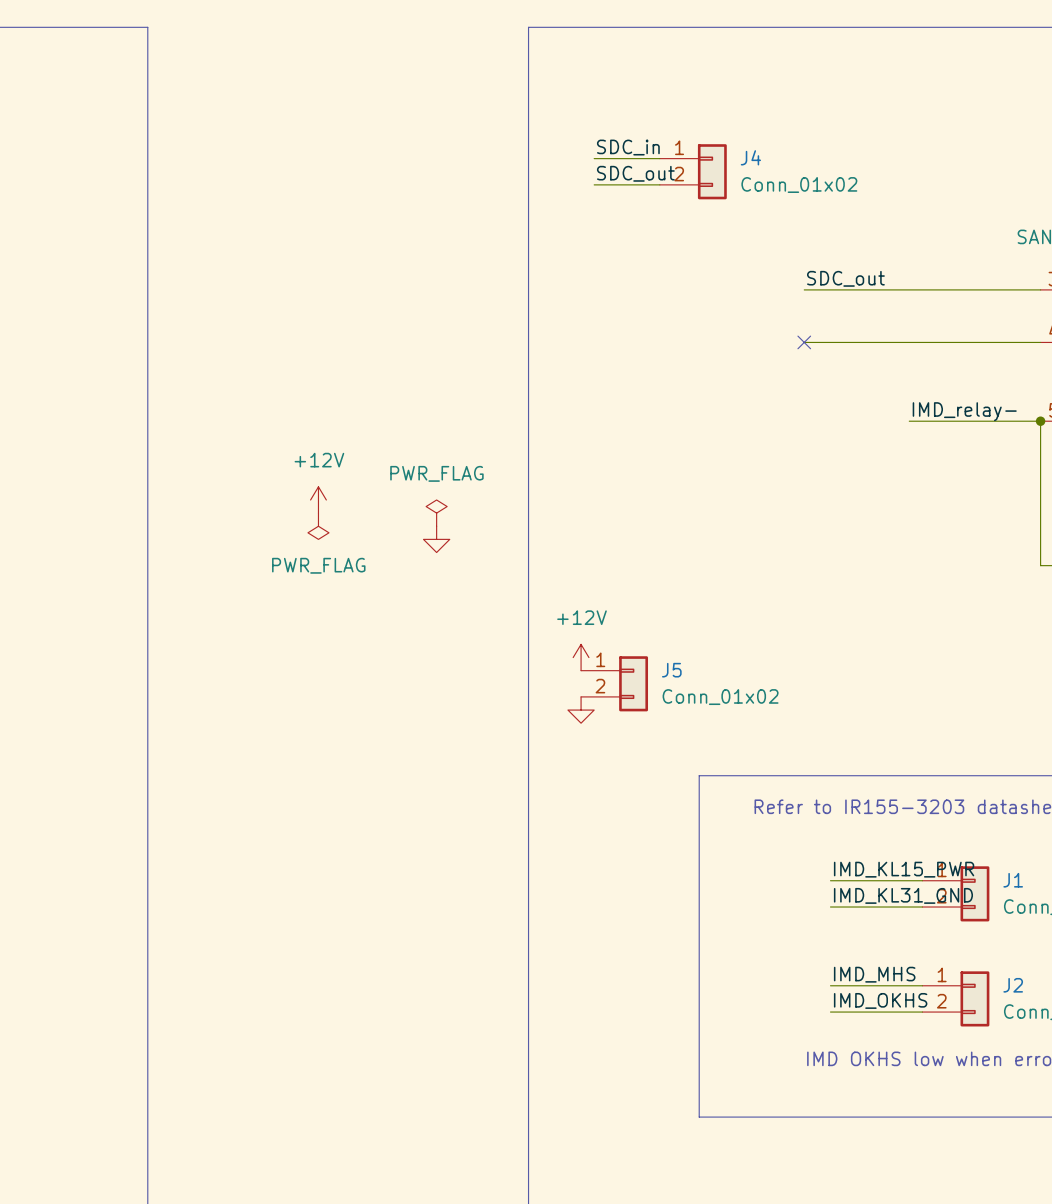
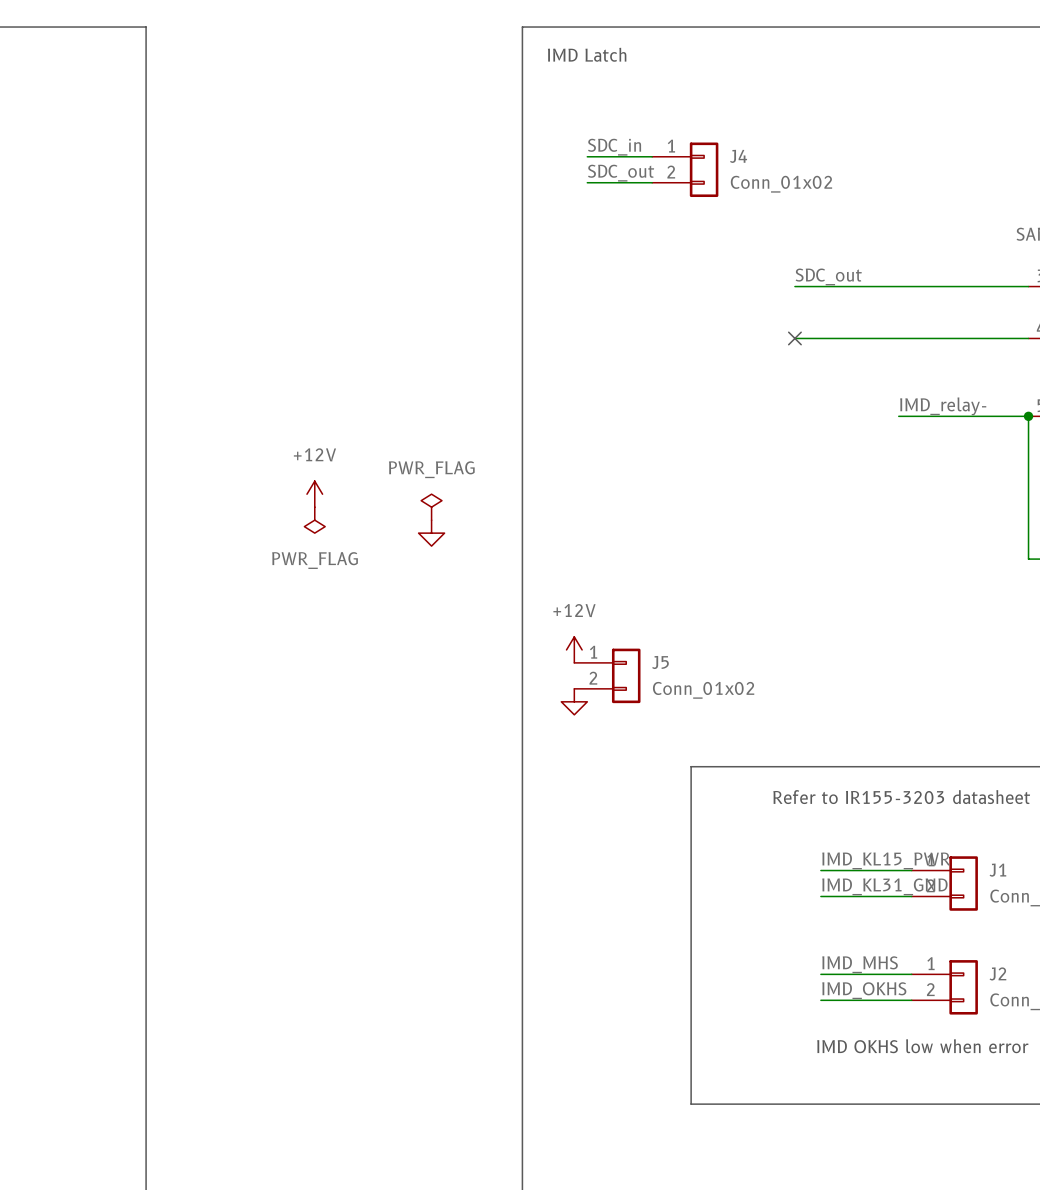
text: none -> IMD Latch (587, 54)

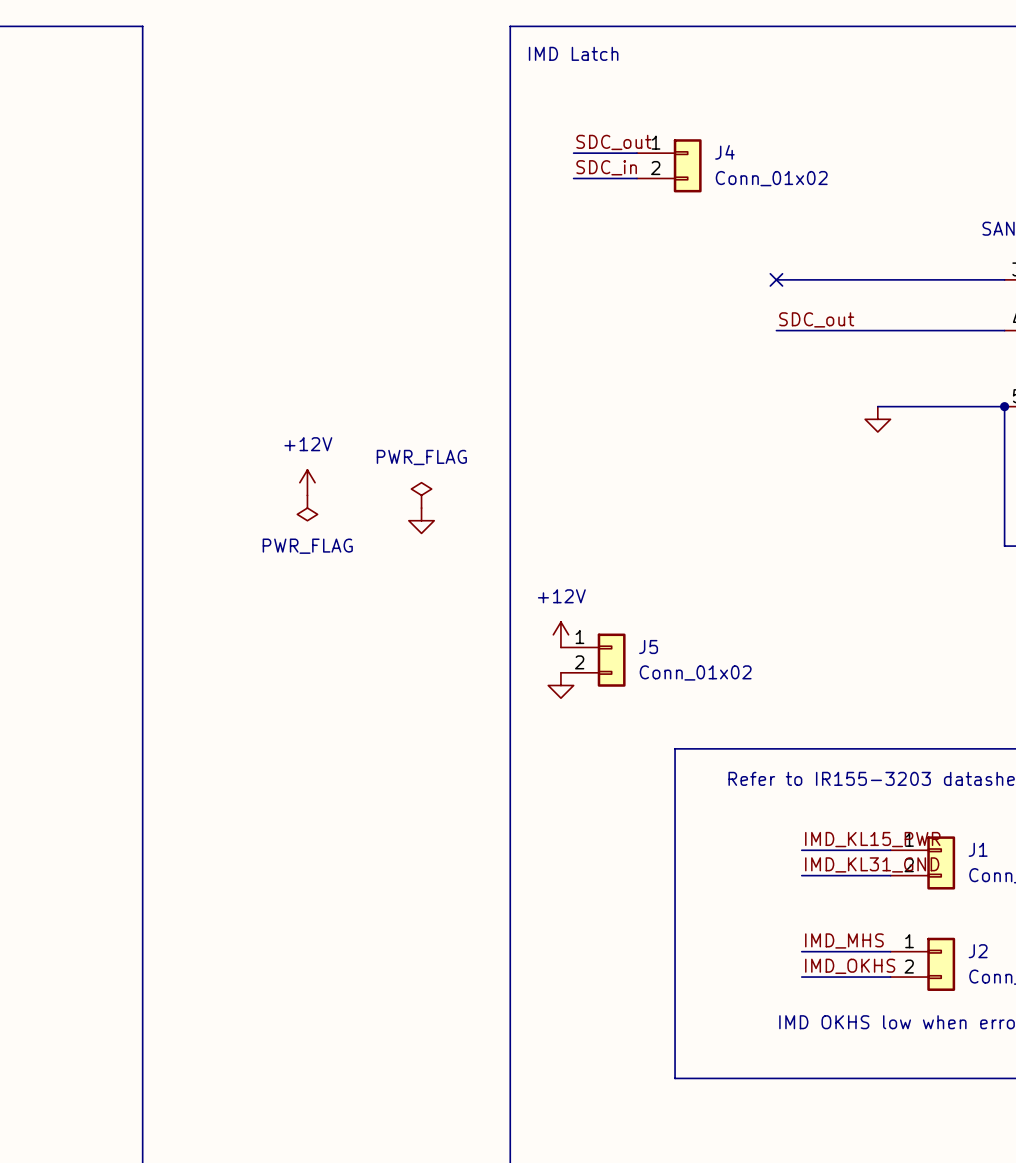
label: SDC_in (614, 147) -> SDC_out (613, 142)
label: SDC_out (621, 173) -> SDC_in (606, 167)
label position: SDC_out (828, 276) -> SDC_out (816, 319)
no-connect mark position: (794, 338) -> (776, 279)
label: IMD_relay- (943, 406) -> none
power symbol: none -> (877, 419)

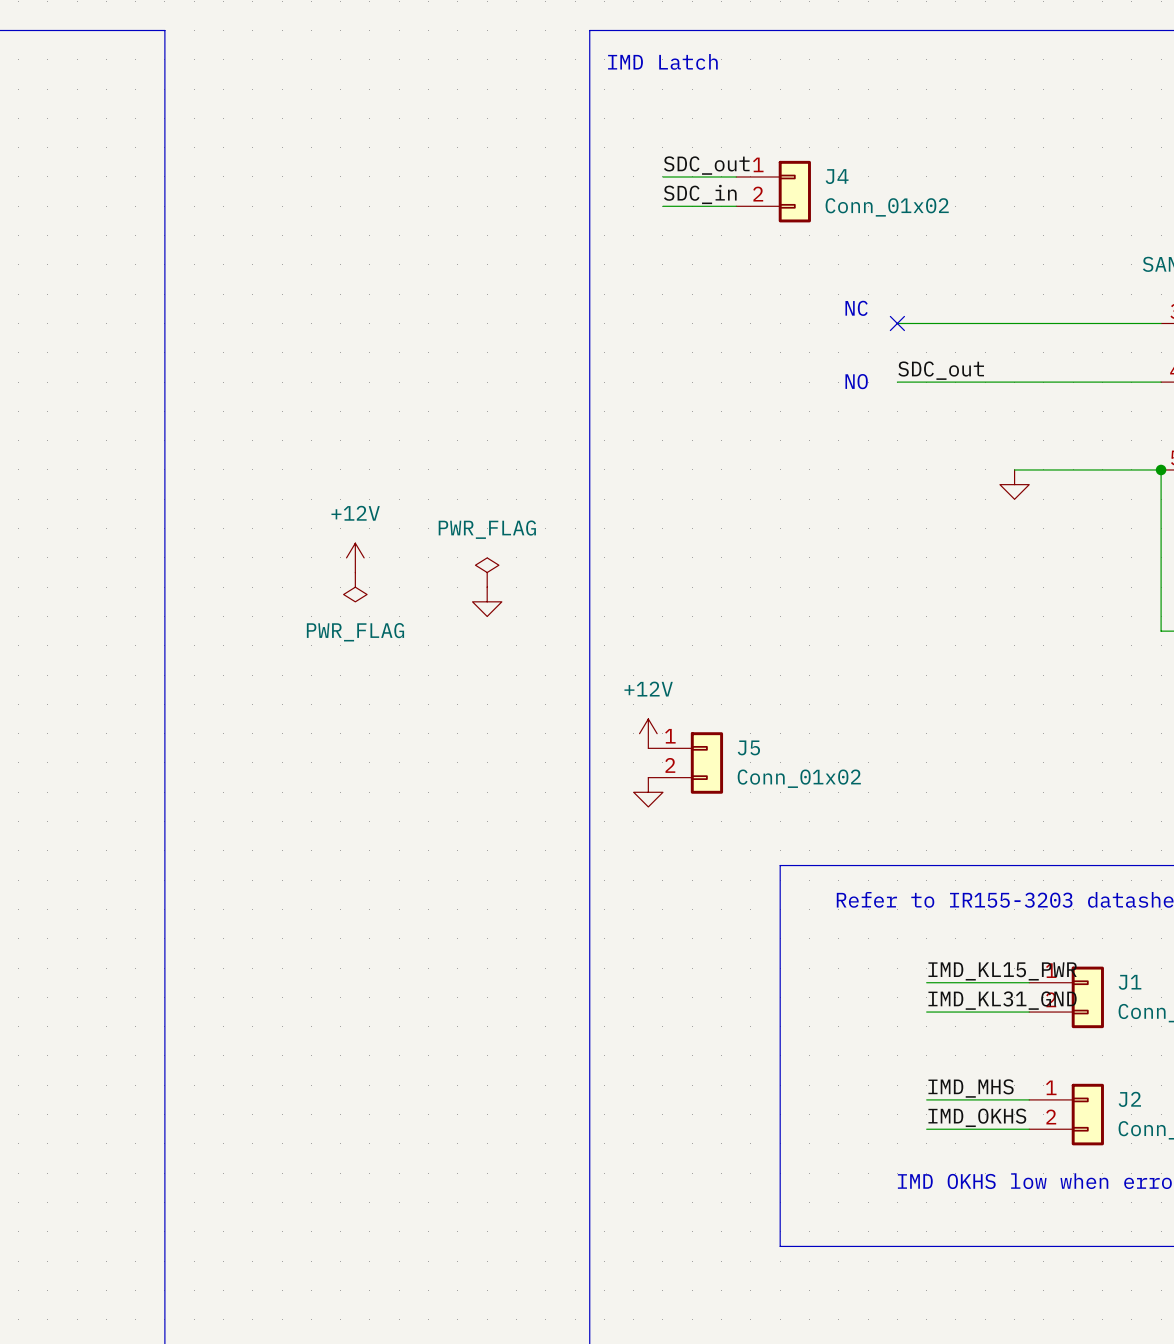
text: none -> NC (856, 308)
text: none -> NO (856, 381)

